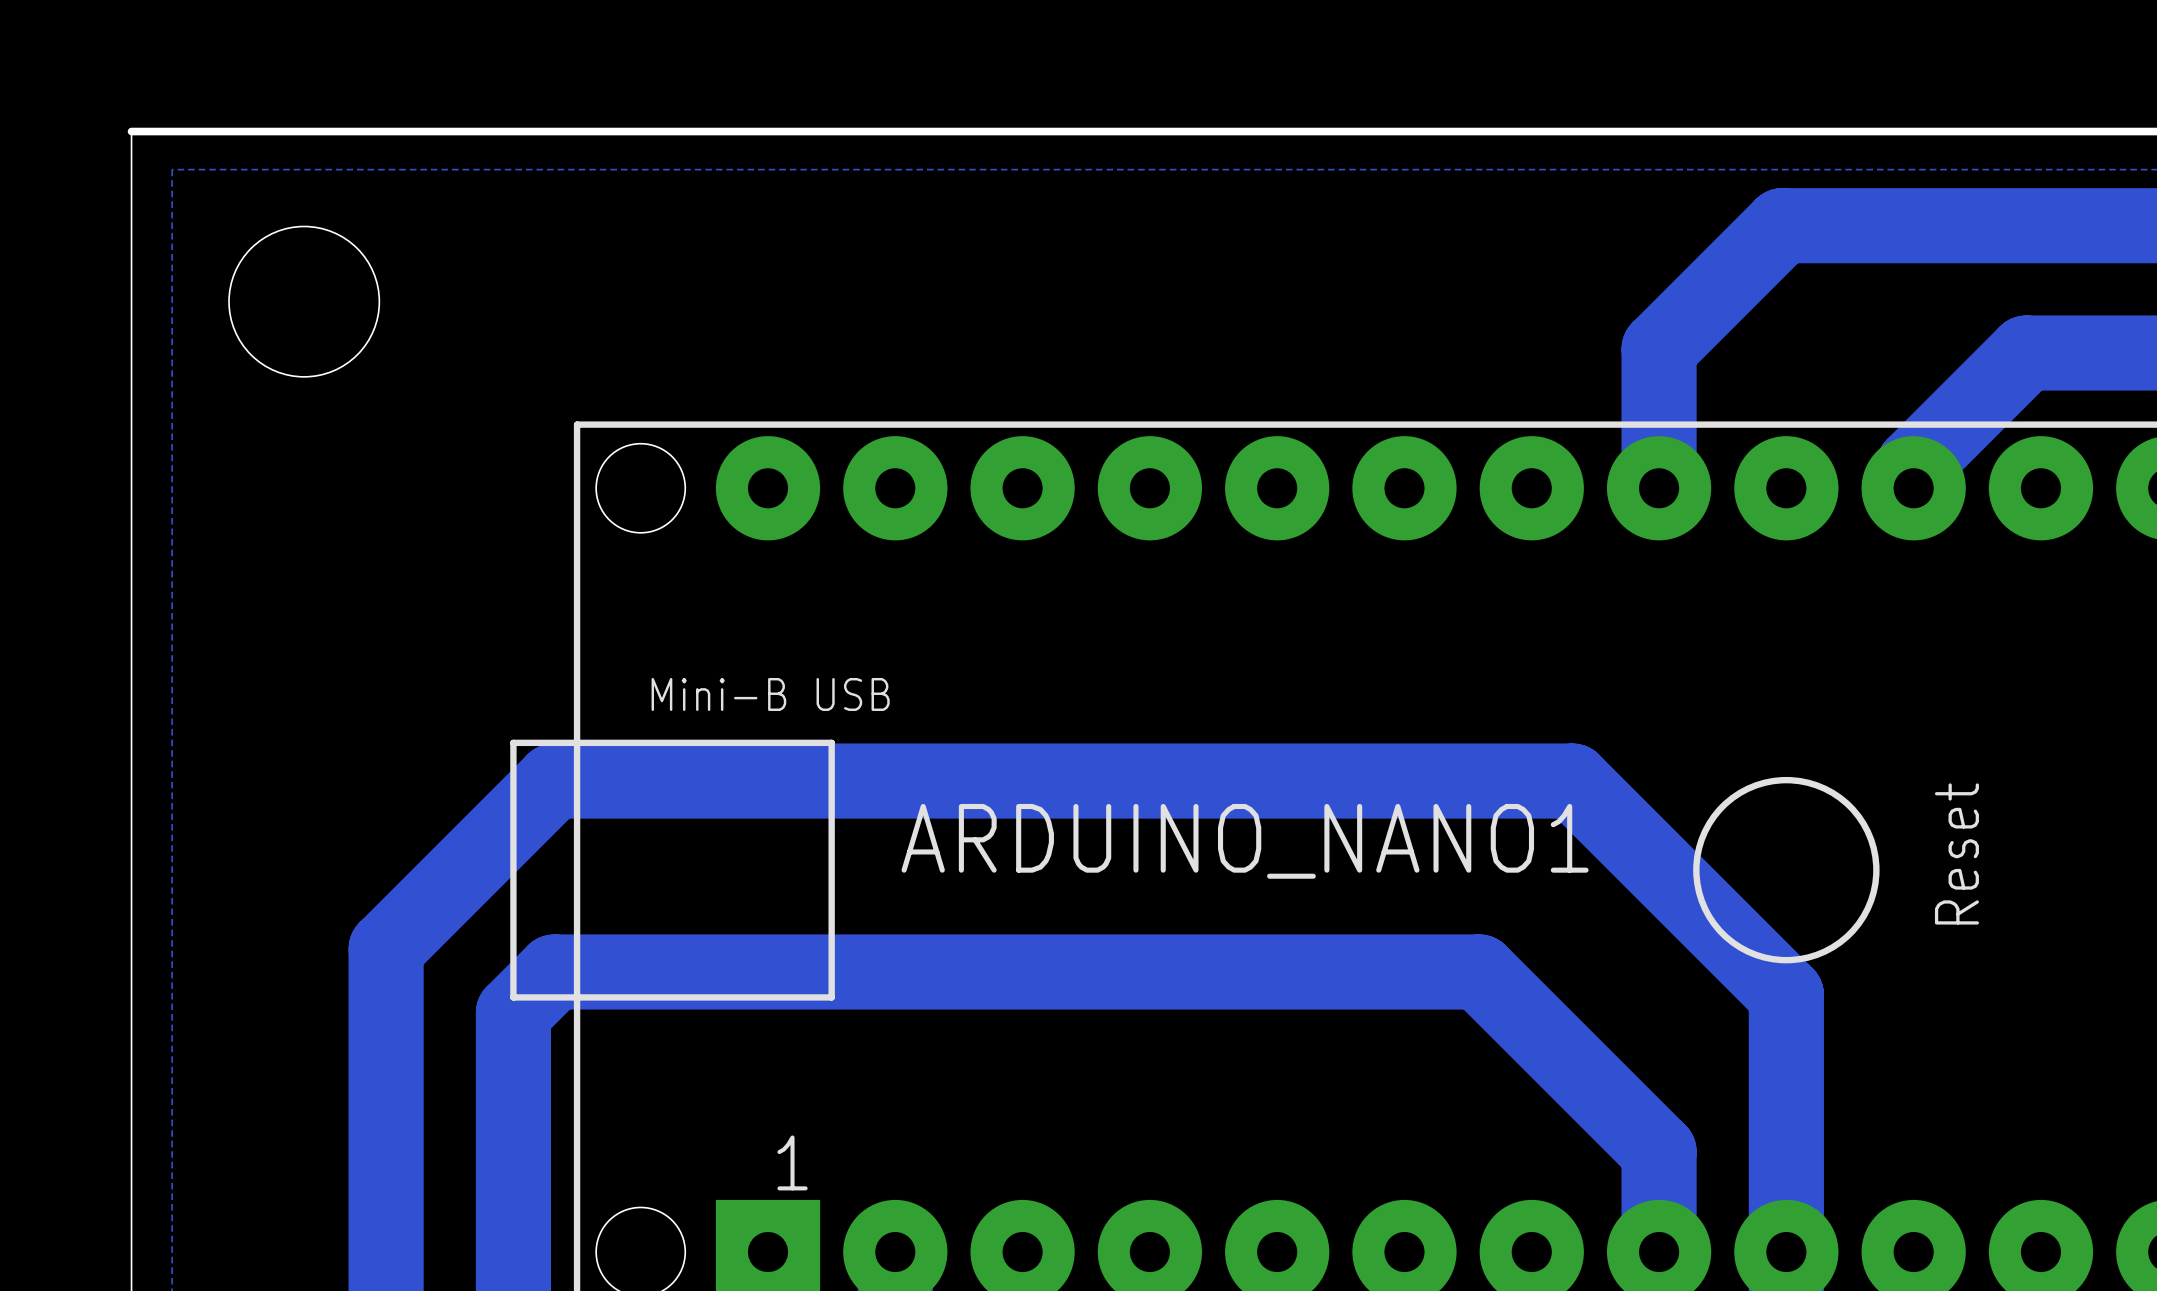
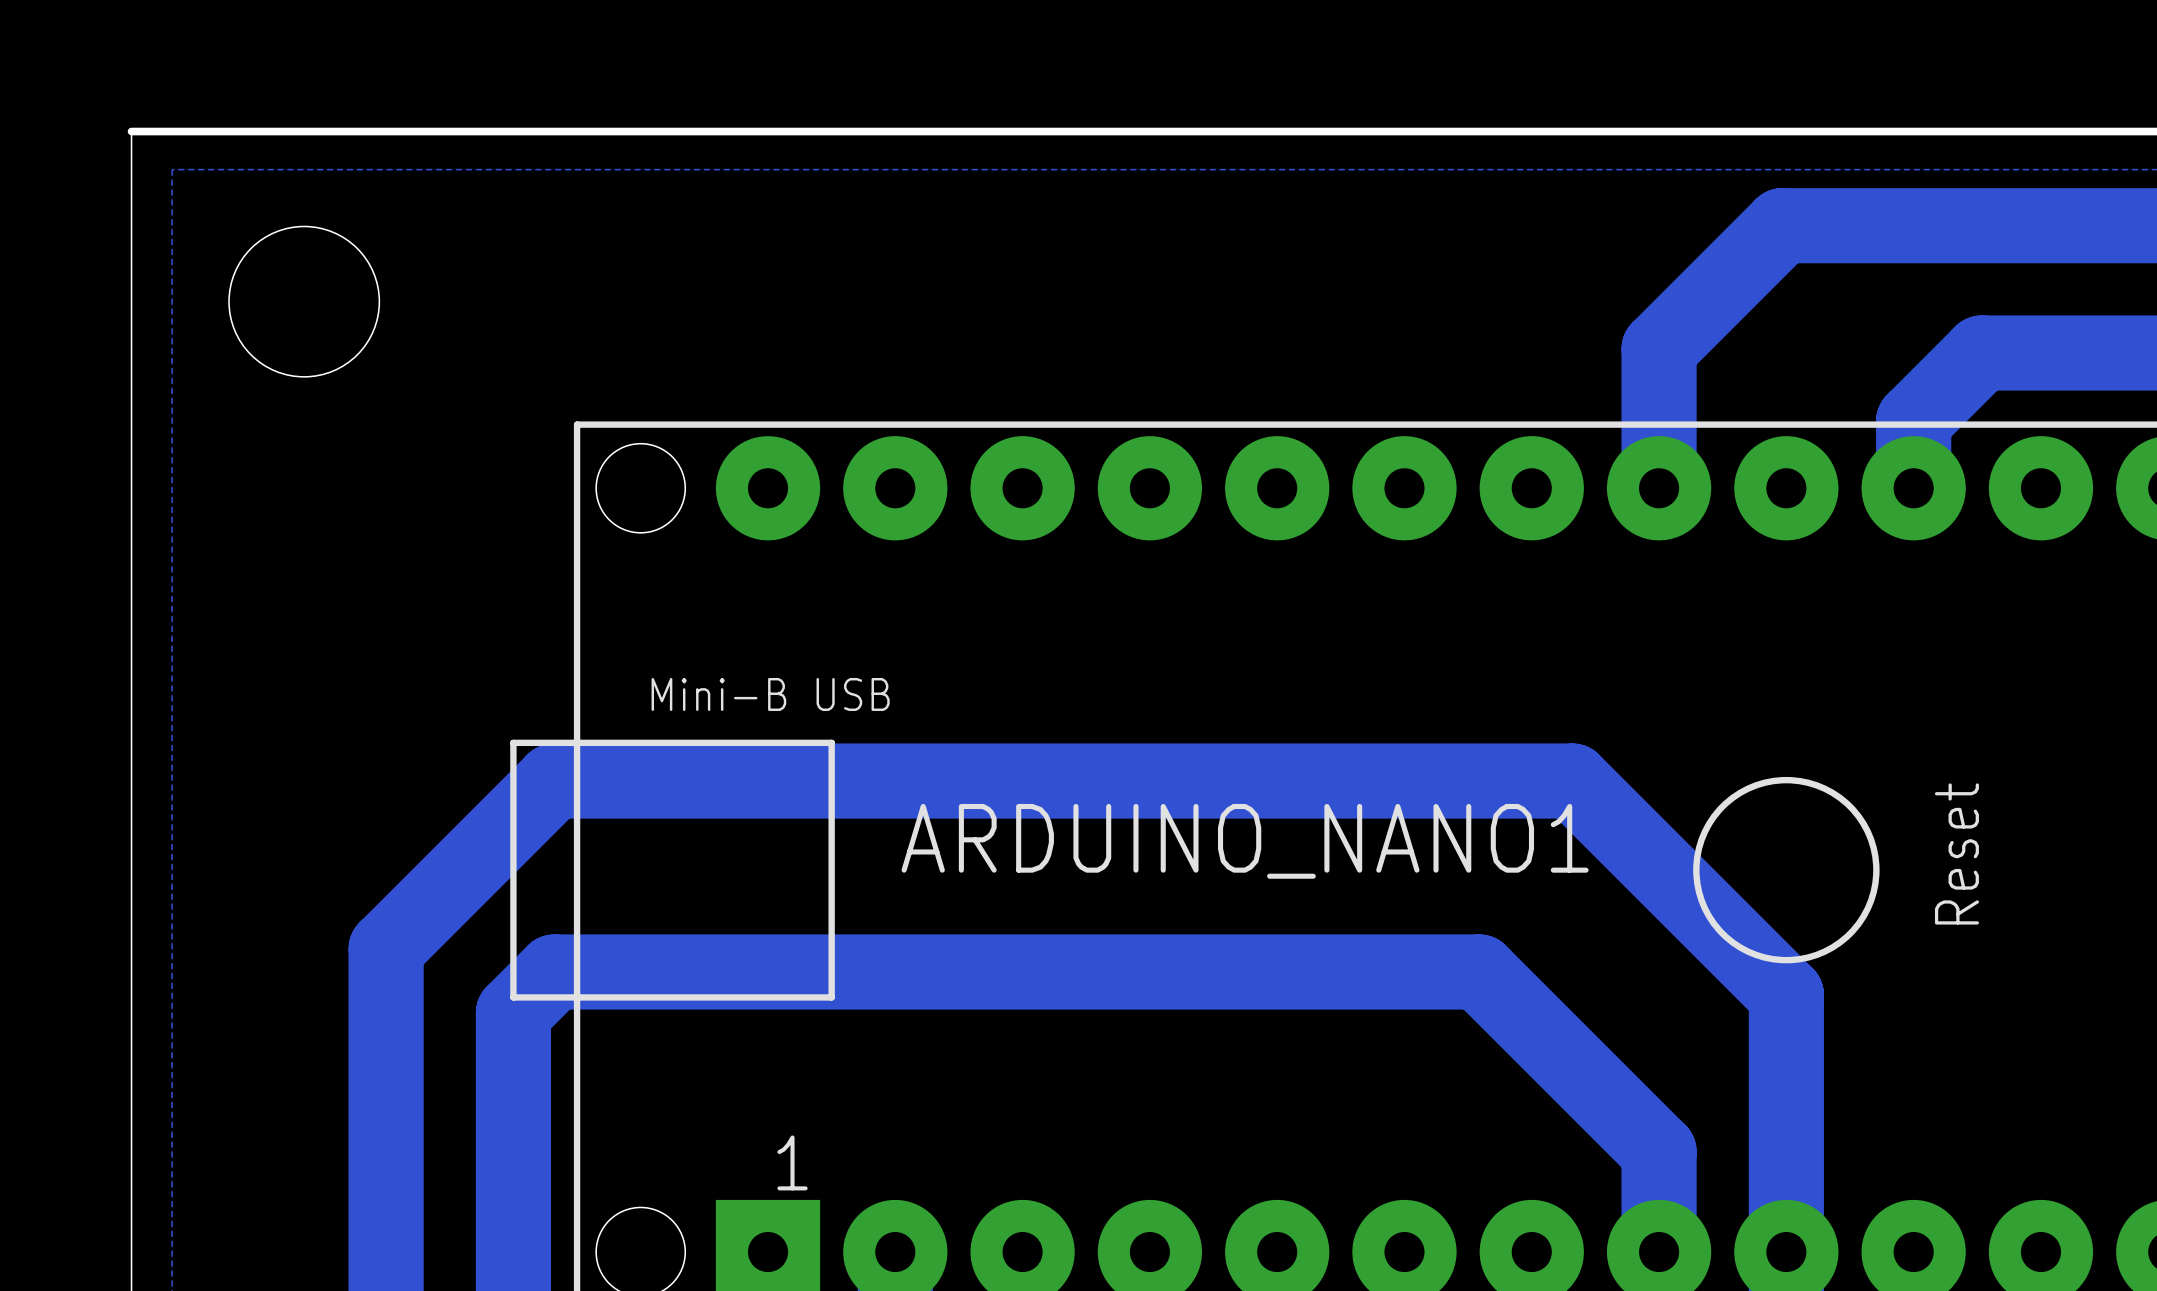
bottom track: (2026, 352) (1913, 465) -> (2026, 352) (1981, 352) (1913, 421) (1913, 465)

